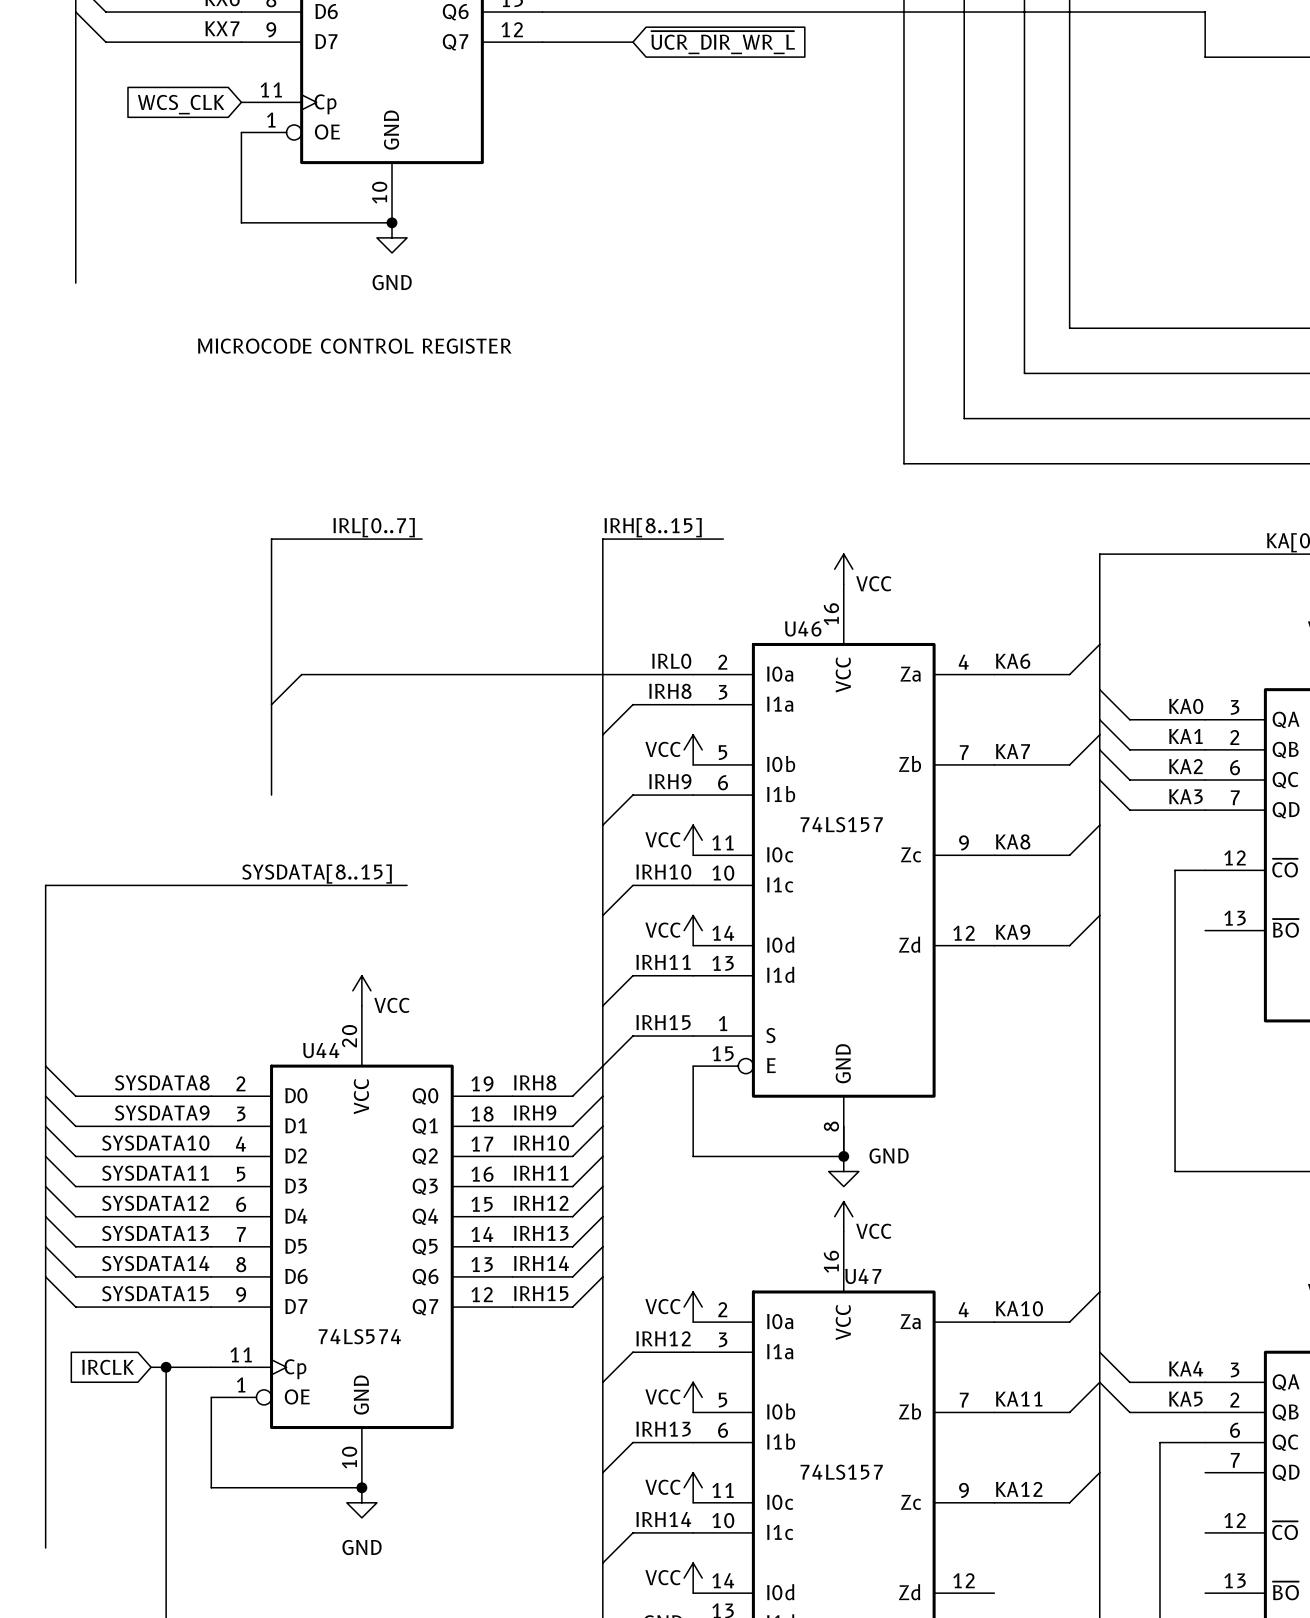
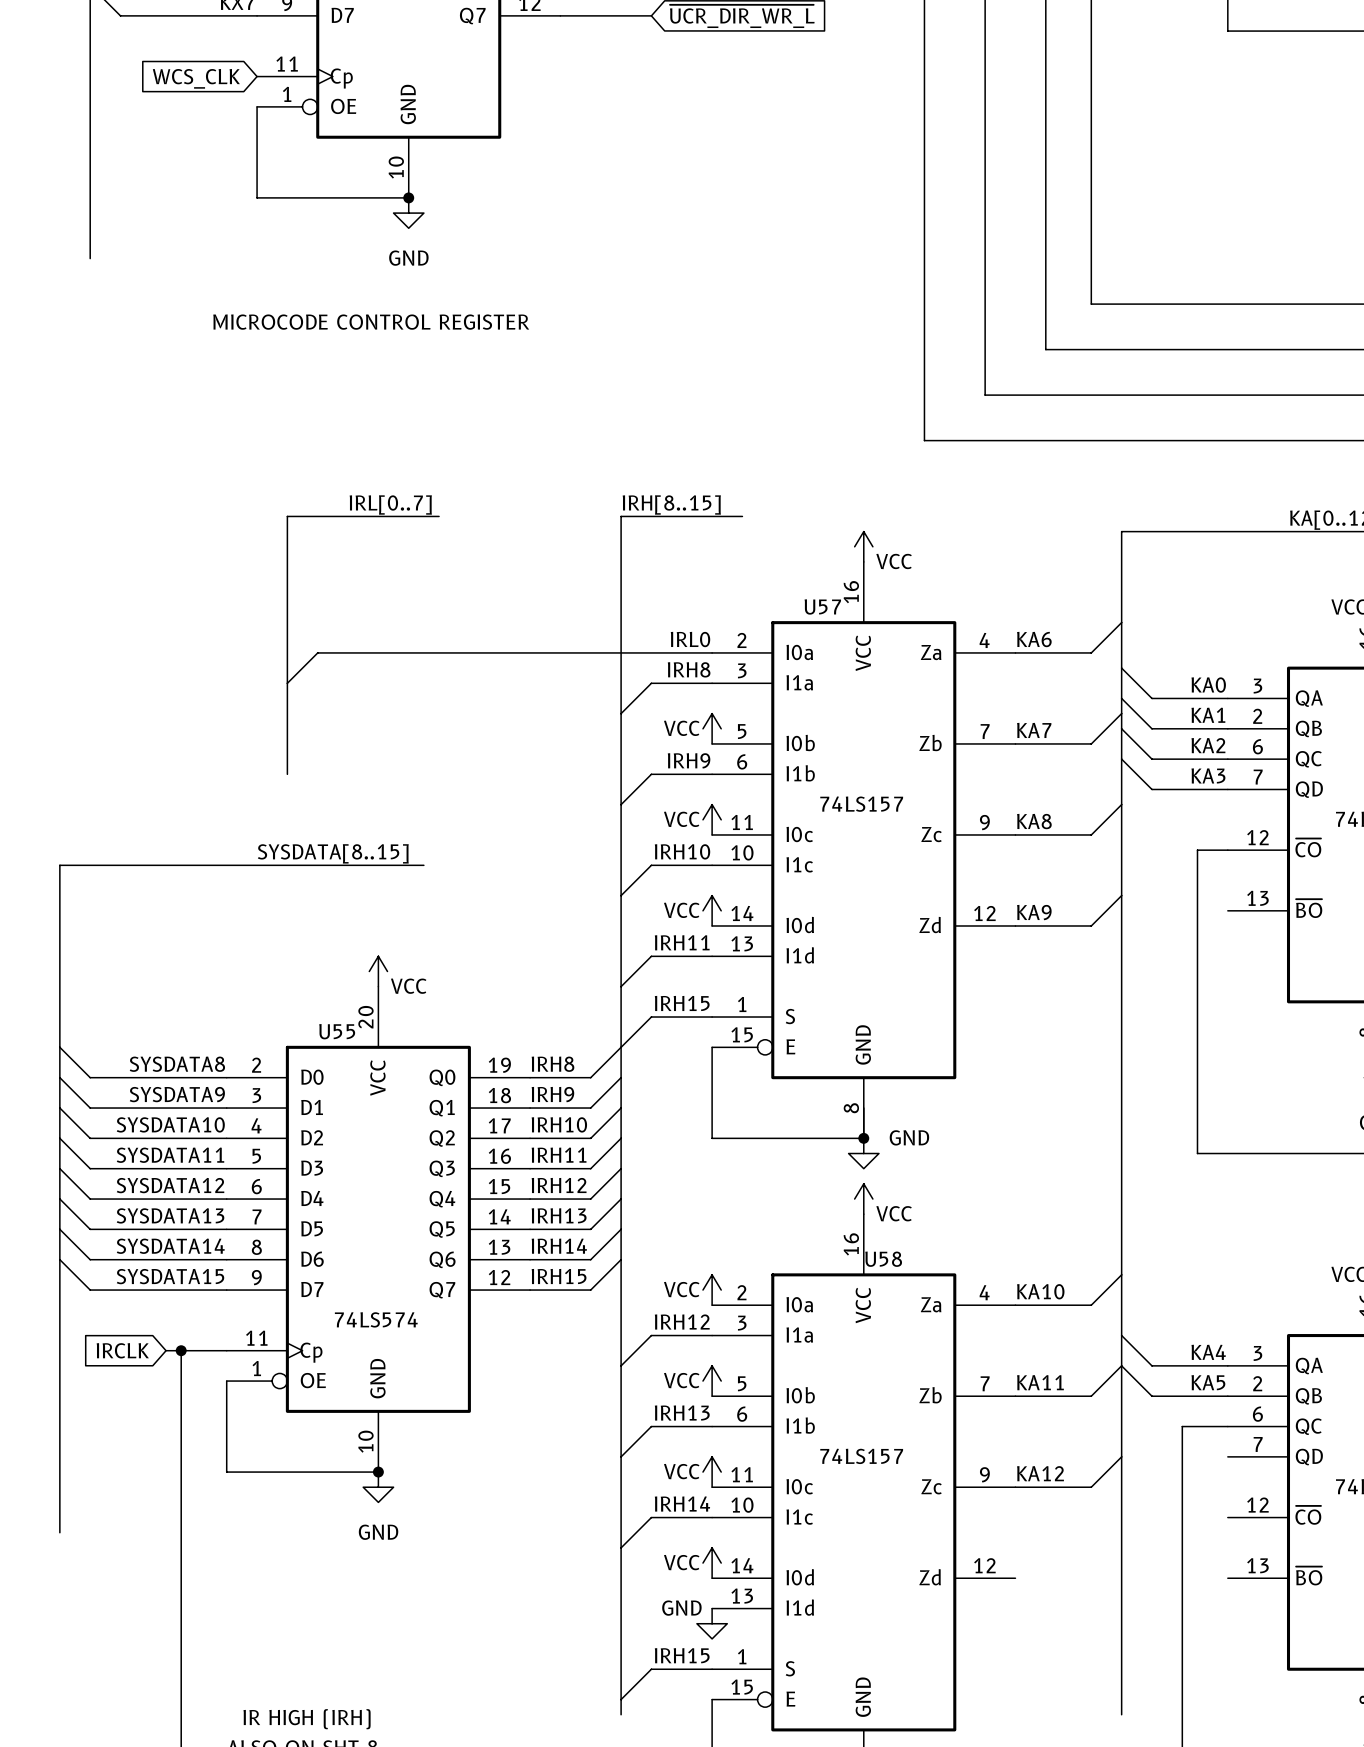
U46 name: U46 (803, 628) -> U57 (822, 606)
U44 name: U44 (321, 1050) -> U55 (337, 1031)
U47 name: U47 (863, 1276) -> U58 (883, 1259)

